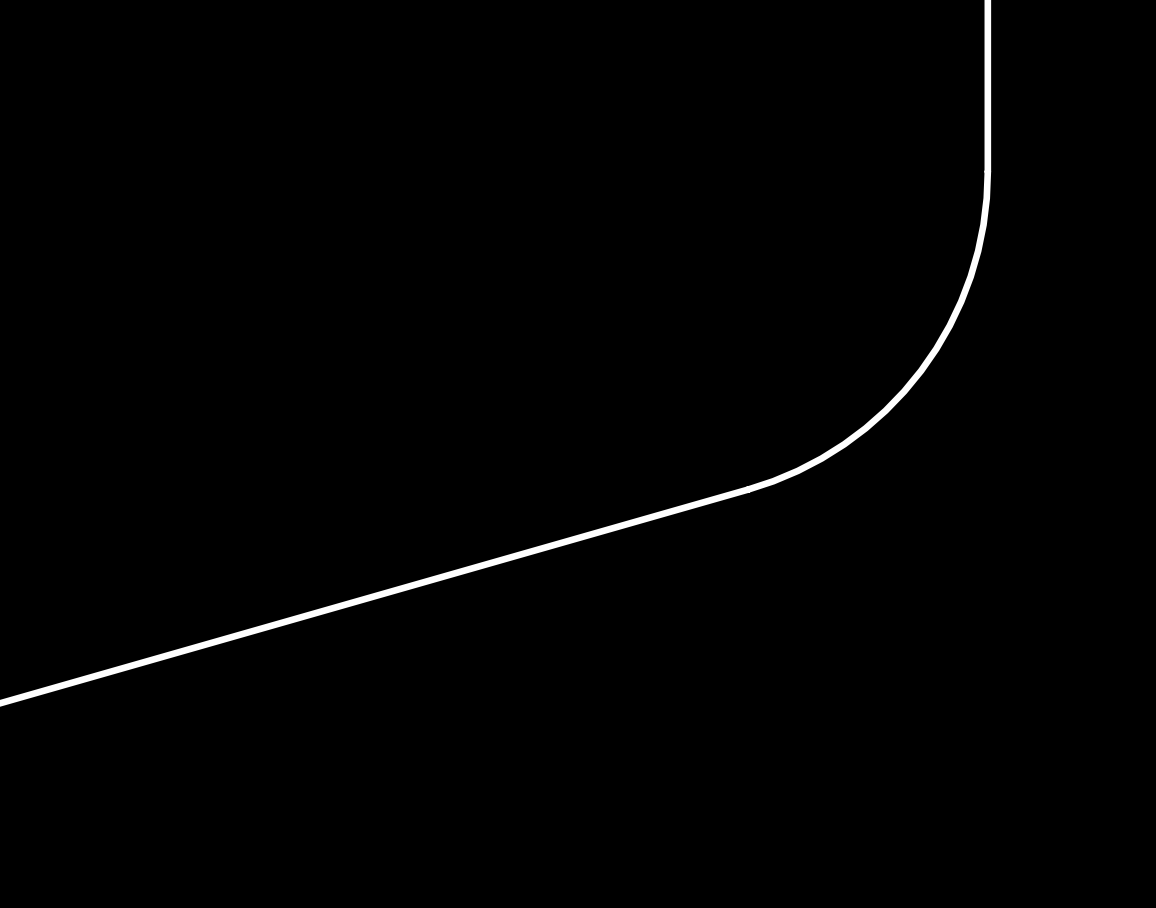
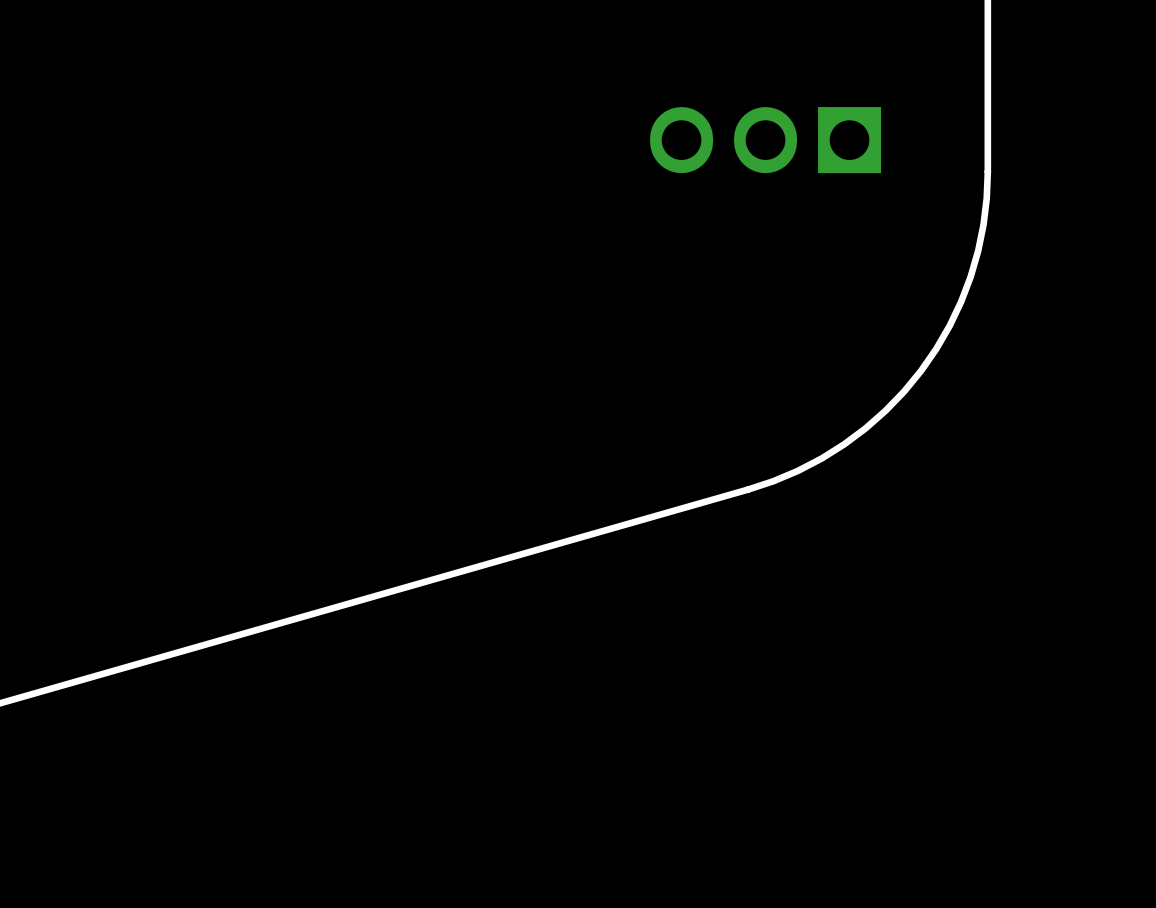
part: none -> (765, 140)

